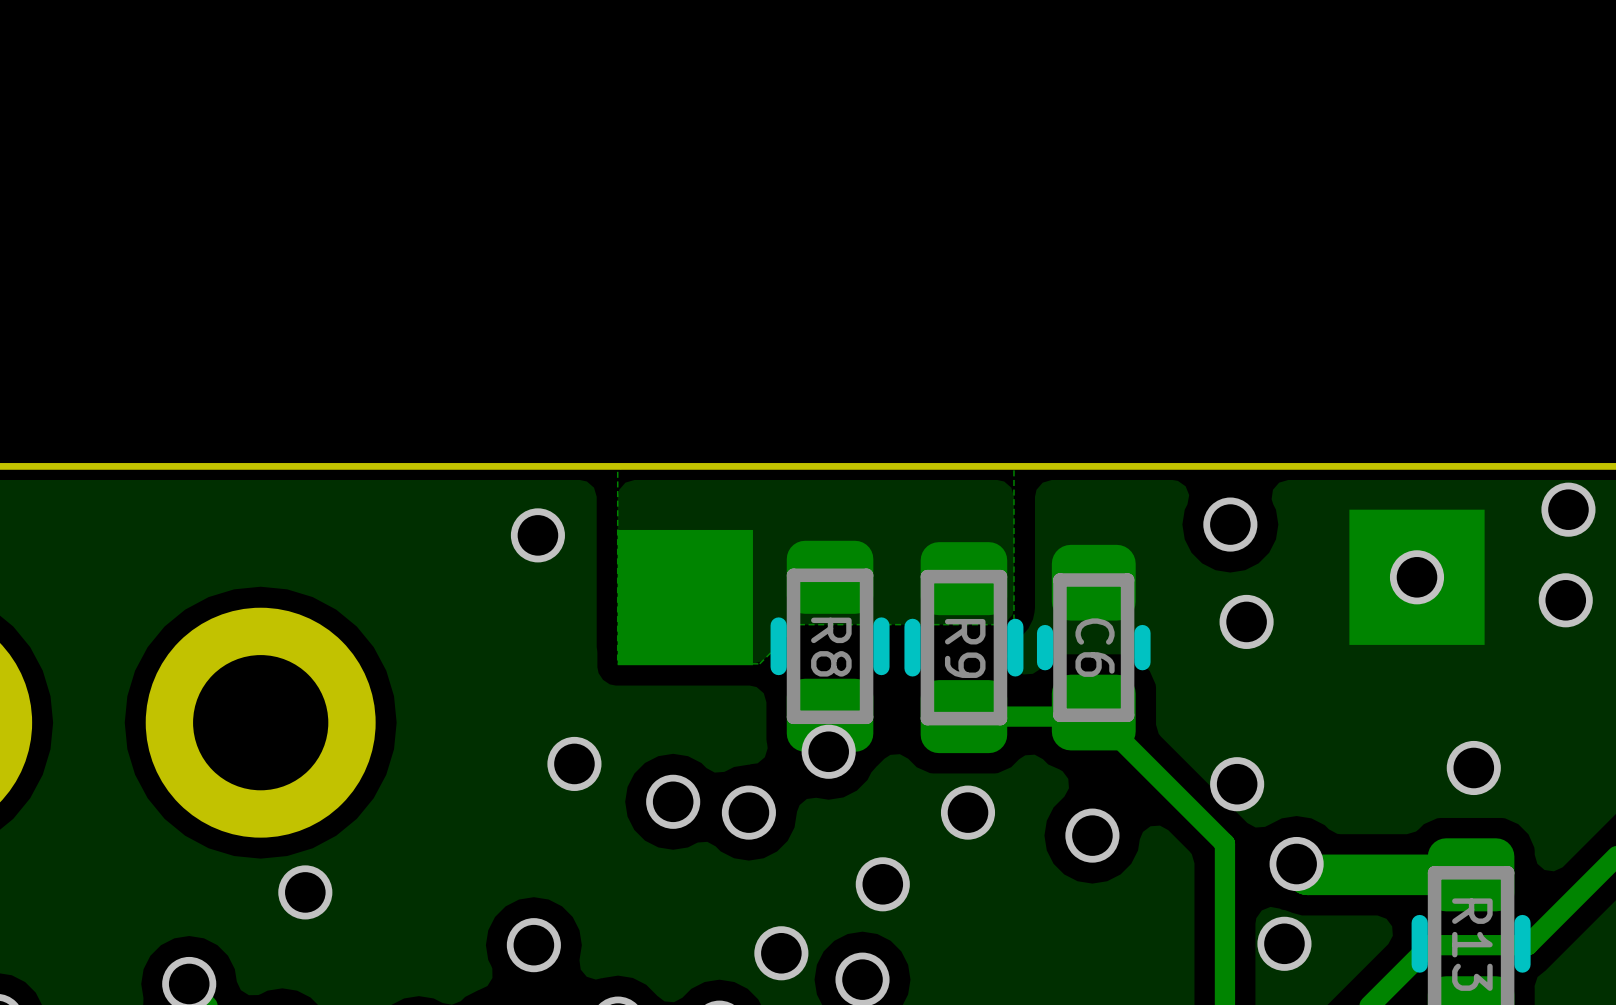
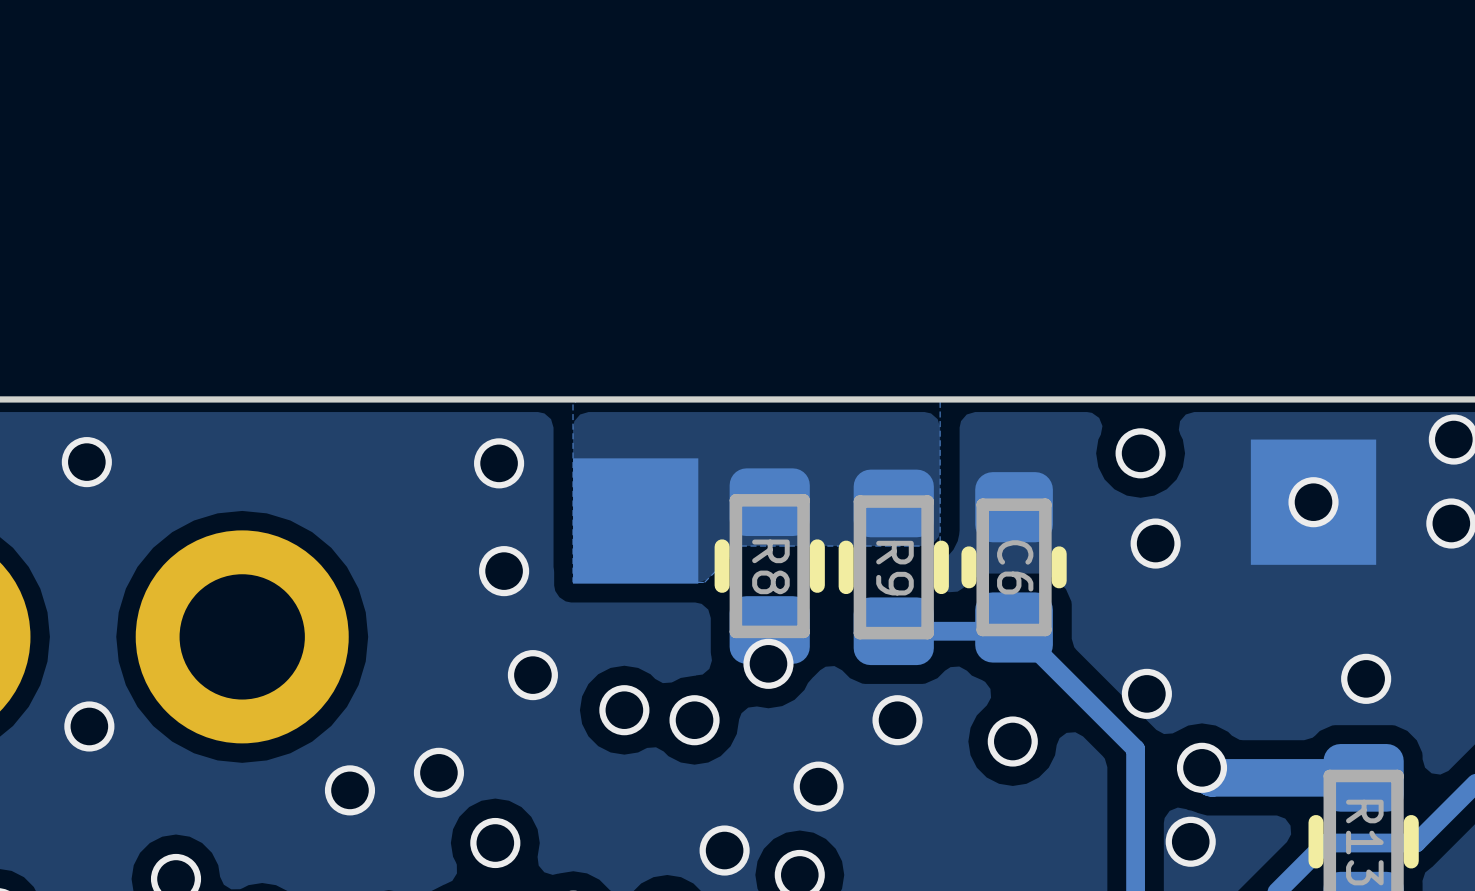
via: none -> (86, 462)
via: none -> (504, 571)
via: none -> (89, 726)
via: none -> (438, 772)
via position: (305, 892) -> (349, 790)

